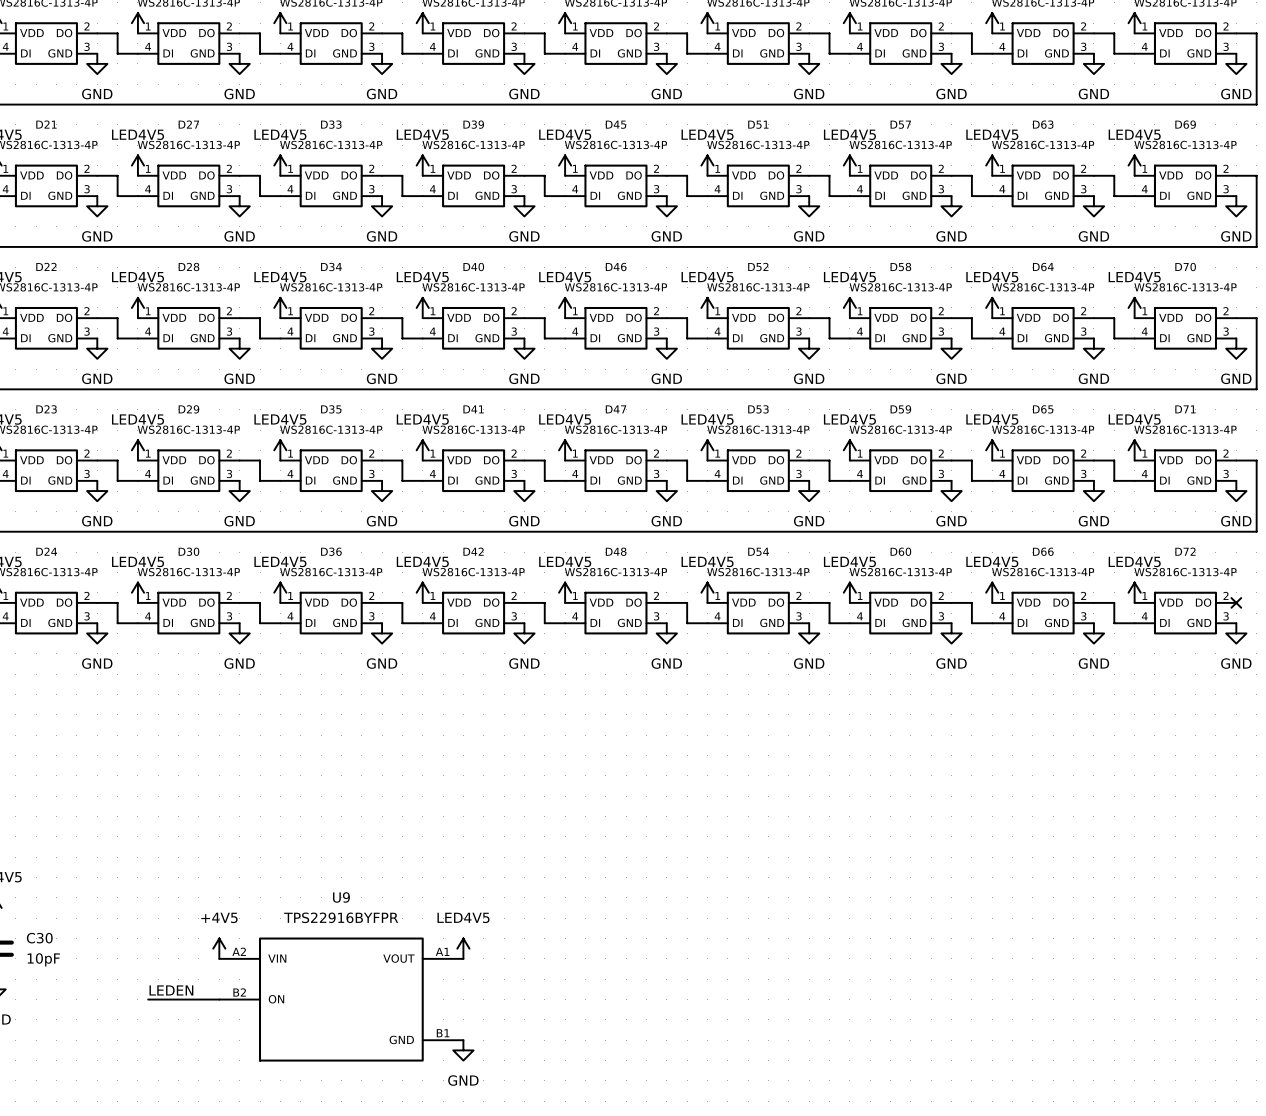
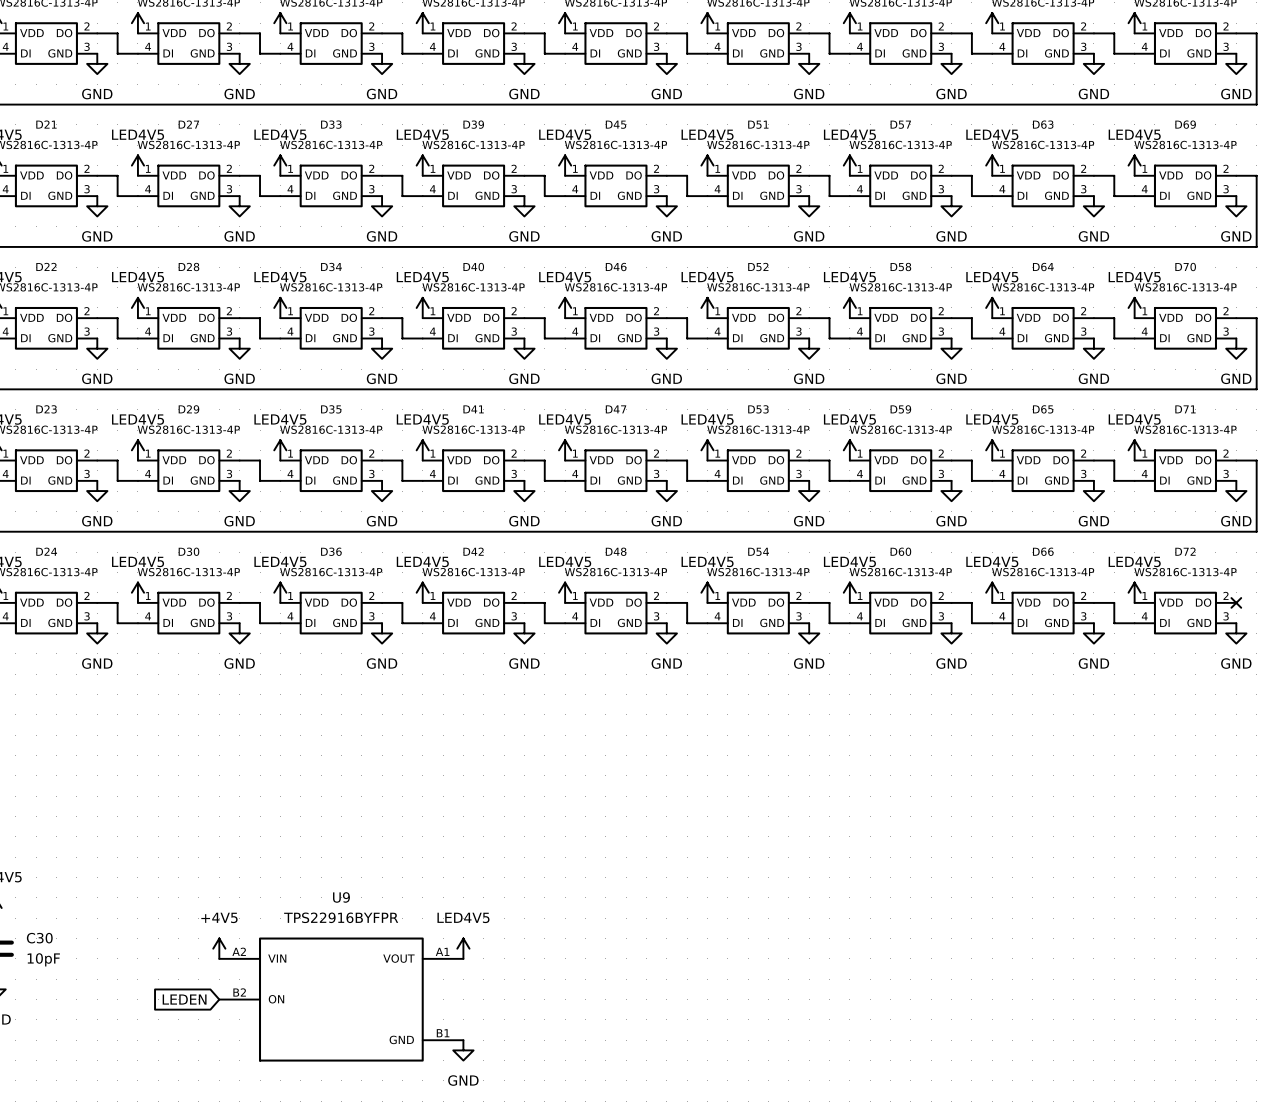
label: LEDEN (171, 990) -> none
wire: (148, 999) (219, 999) -> none
global label: none -> LEDEN (184, 999)

